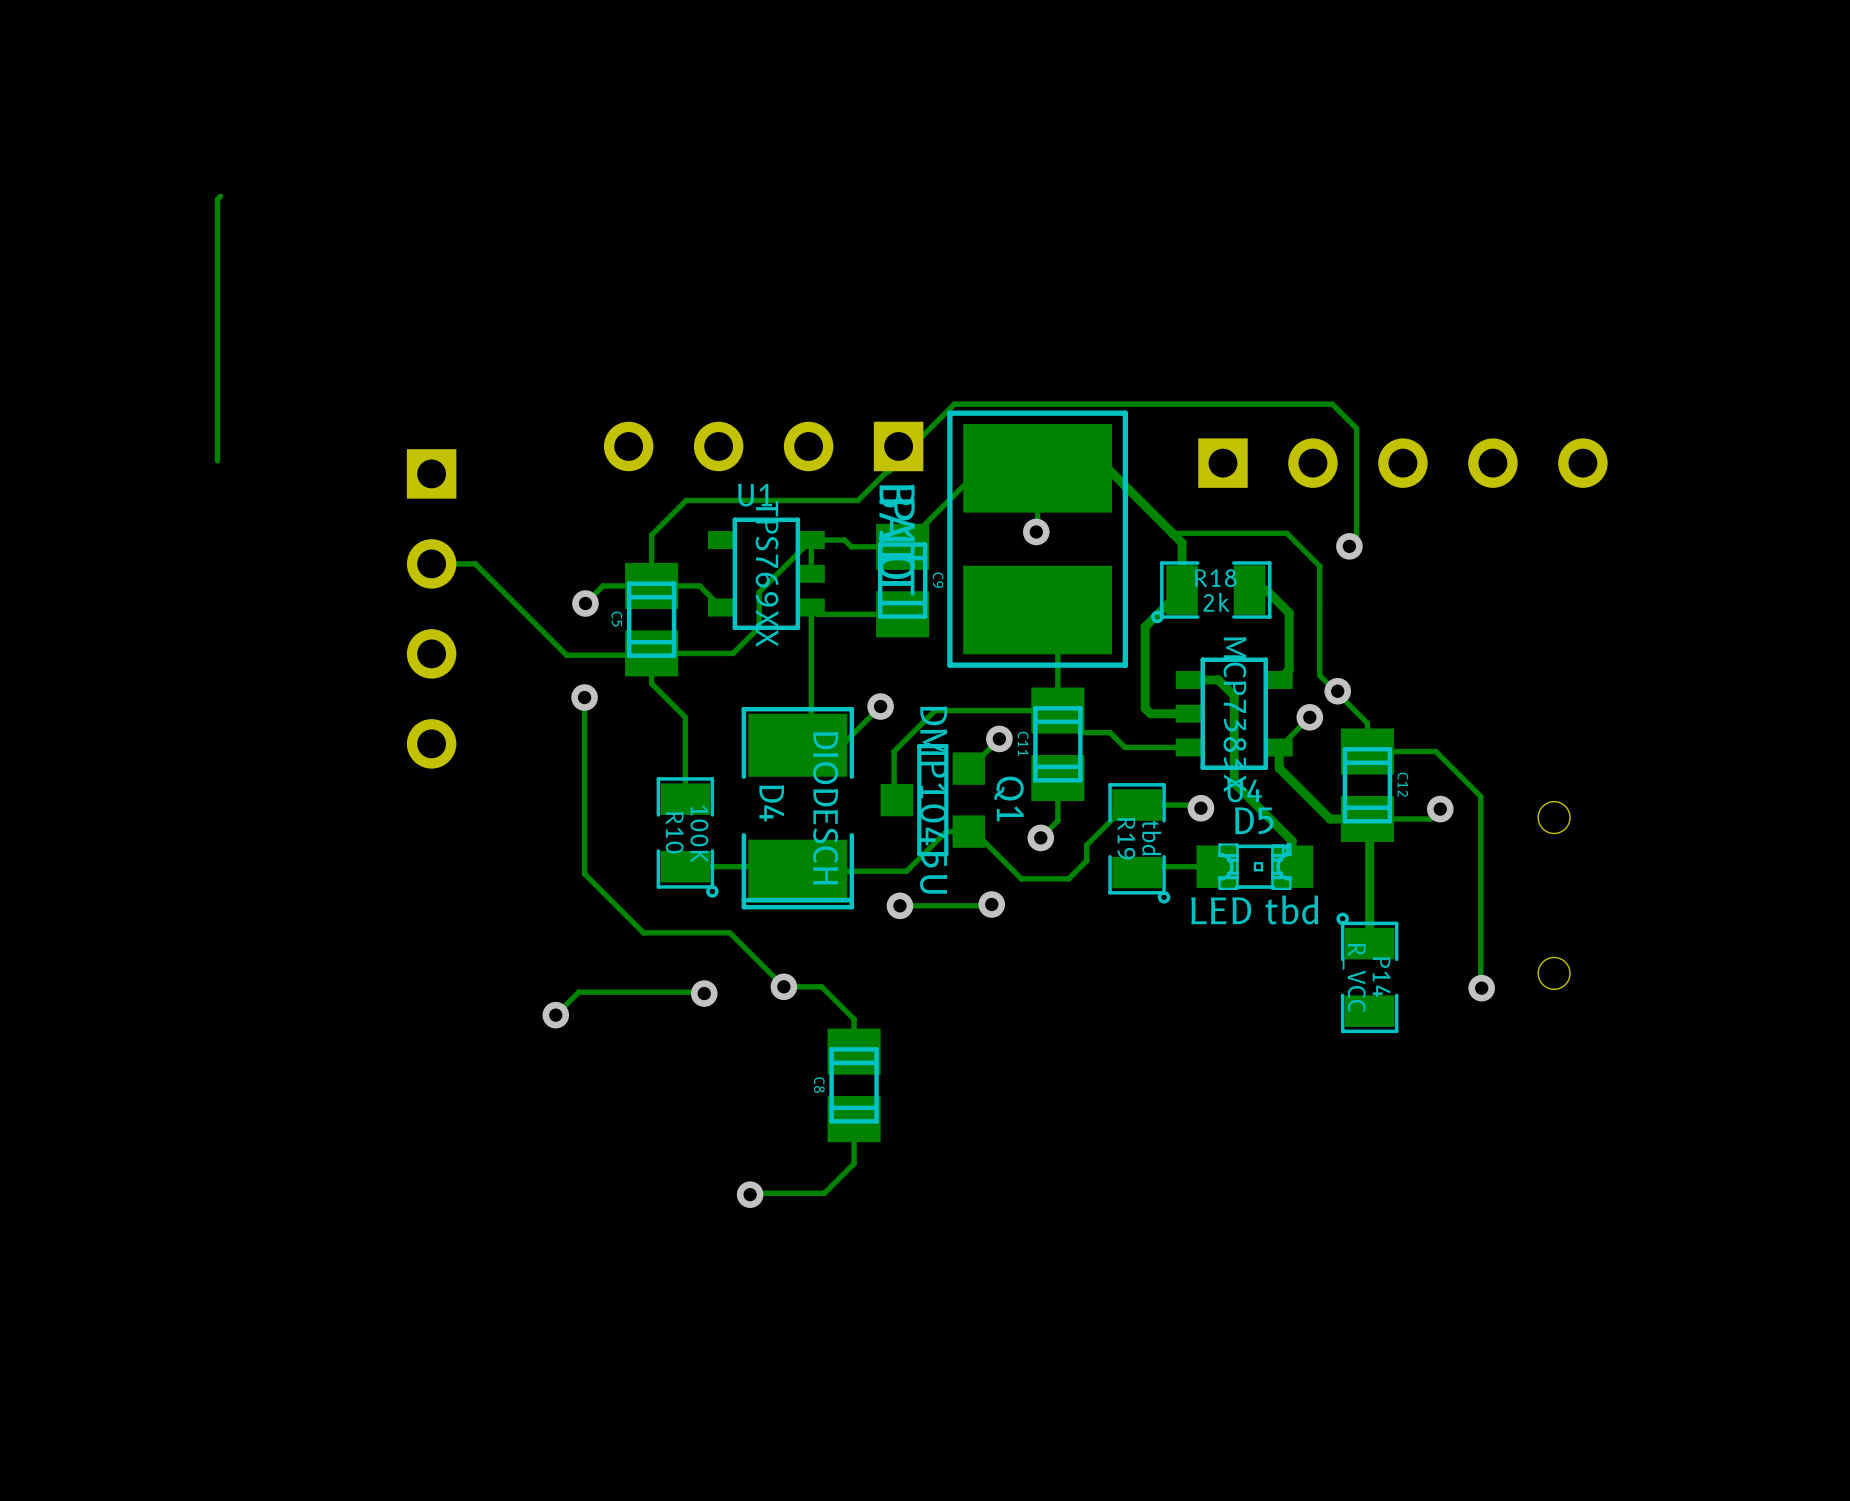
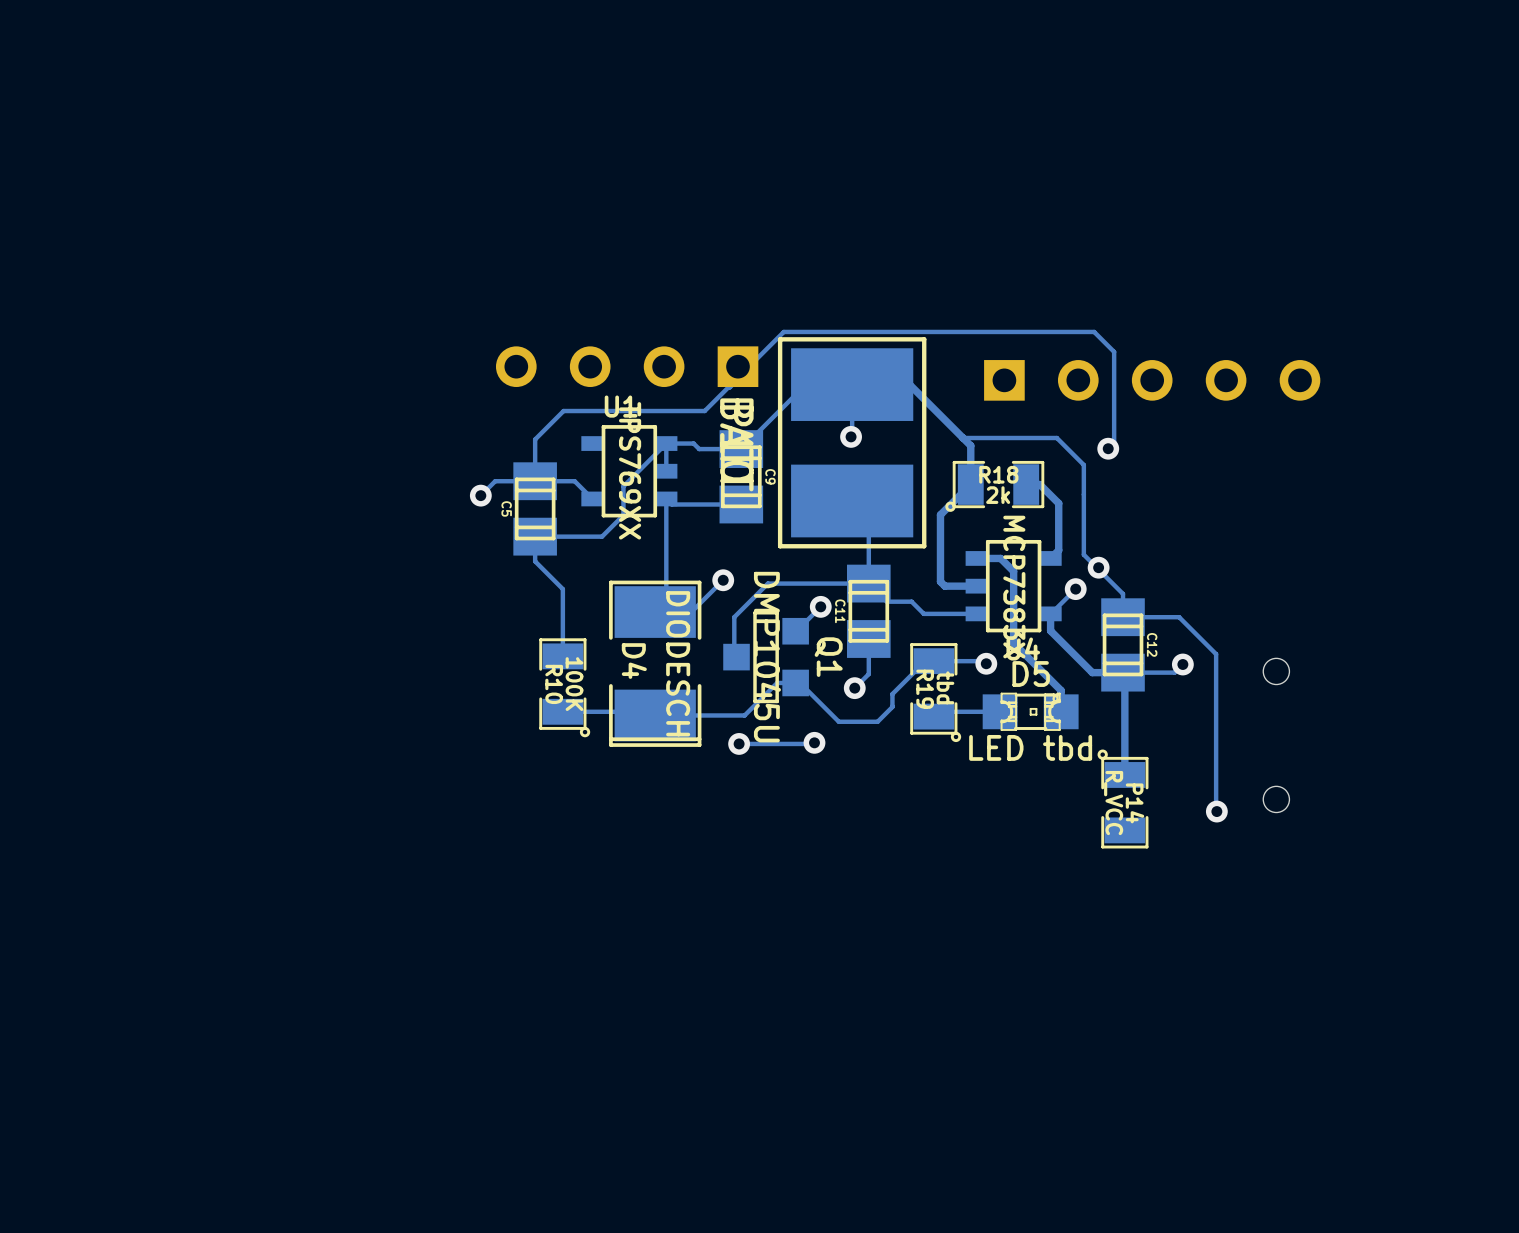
track: (220, 196) (217, 199) (217, 460) -> none
track: (431, 563) (475, 563) (566, 655) (649, 655) (651, 653) -> none
part: (431, 608) -> none
track: (584, 697) (584, 873) (643, 932) (729, 932) (783, 986) (821, 986) (854, 1019) (854, 1051) -> none
via: (584, 697) -> none
via: (783, 986) -> none
track: (704, 993) (578, 992) (555, 1015) -> none
via: (704, 993) -> none
via: (555, 1015) -> none
C8: (854, 1085) -> none
track: (854, 1119) (854, 1163) (824, 1193) (750, 1194) -> none
via: (750, 1194) -> none

